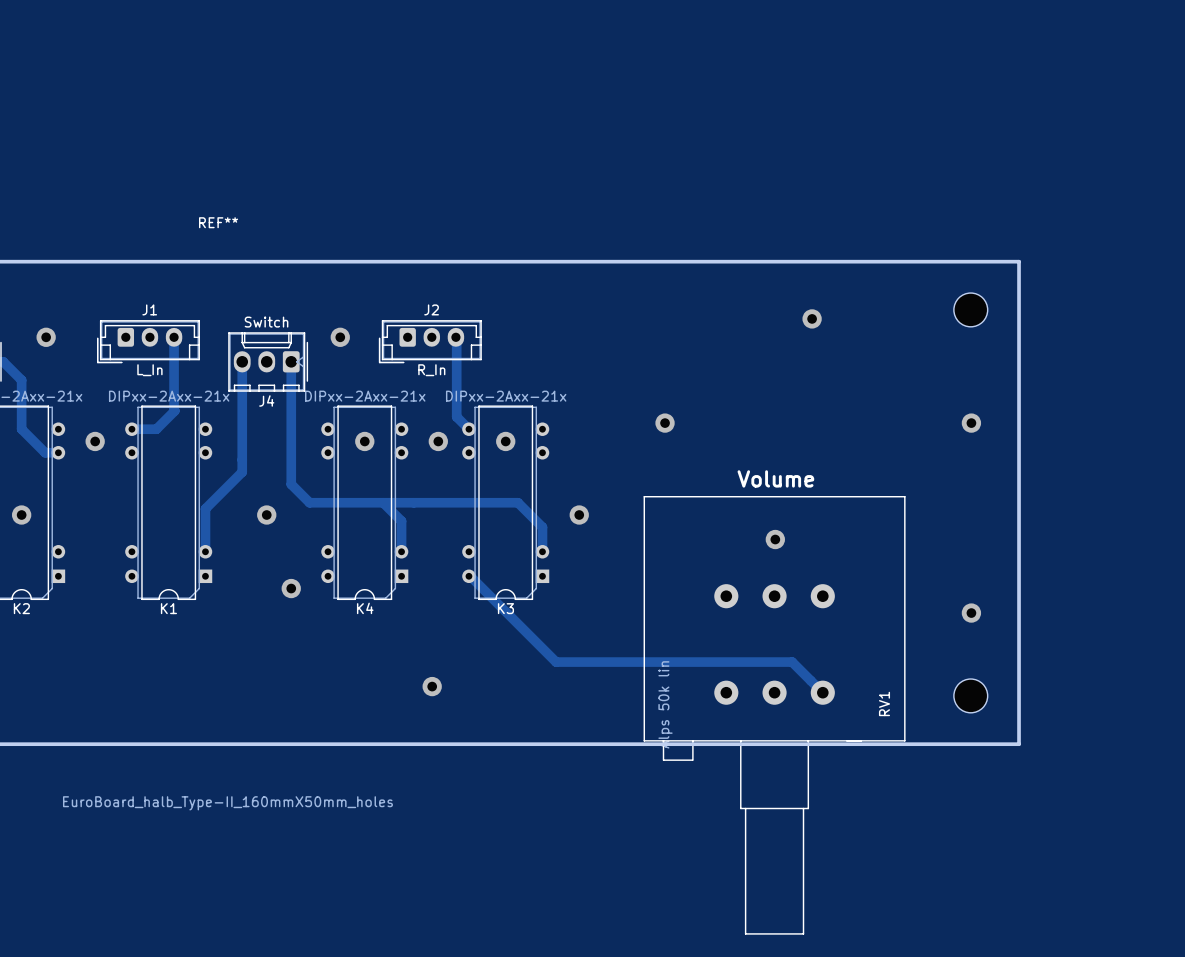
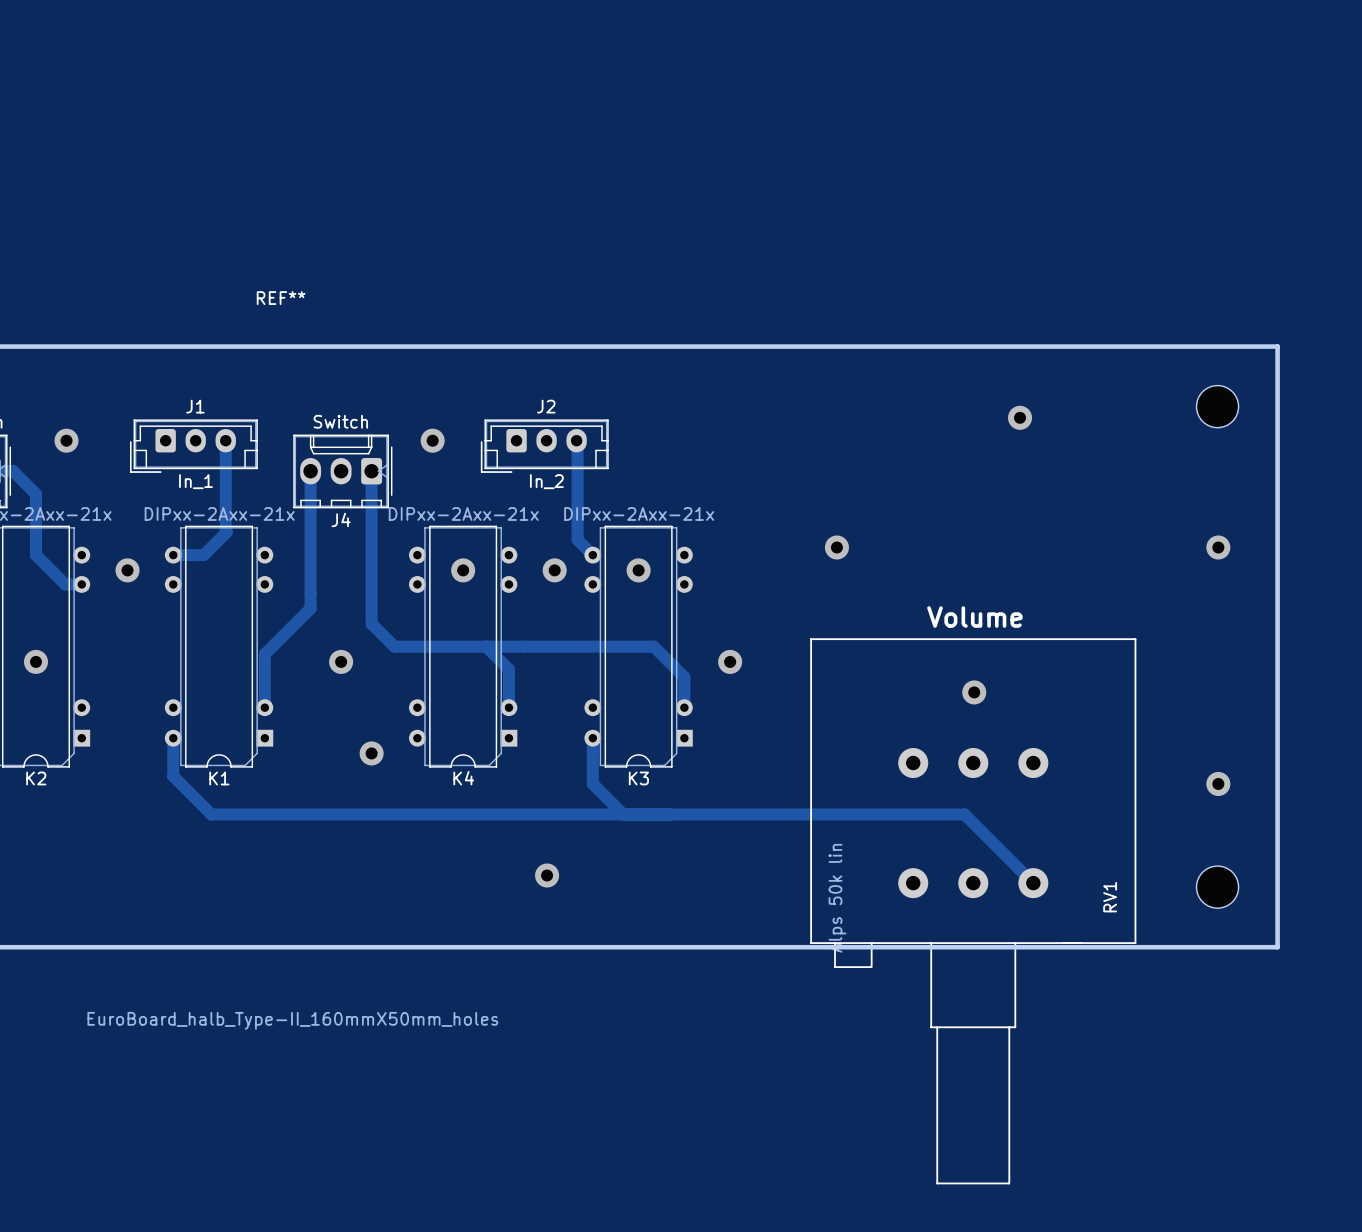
J1 value: L_In (149, 370) -> In_1 (195, 481)
J2 value: R_In (431, 370) -> In_2 (546, 481)
track: none -> (173, 738) (173, 776) (211, 814) (964, 814) (995, 844)
track: (468, 576) (556, 662) (792, 662) -> (592, 738) (592, 783) (623, 814)

